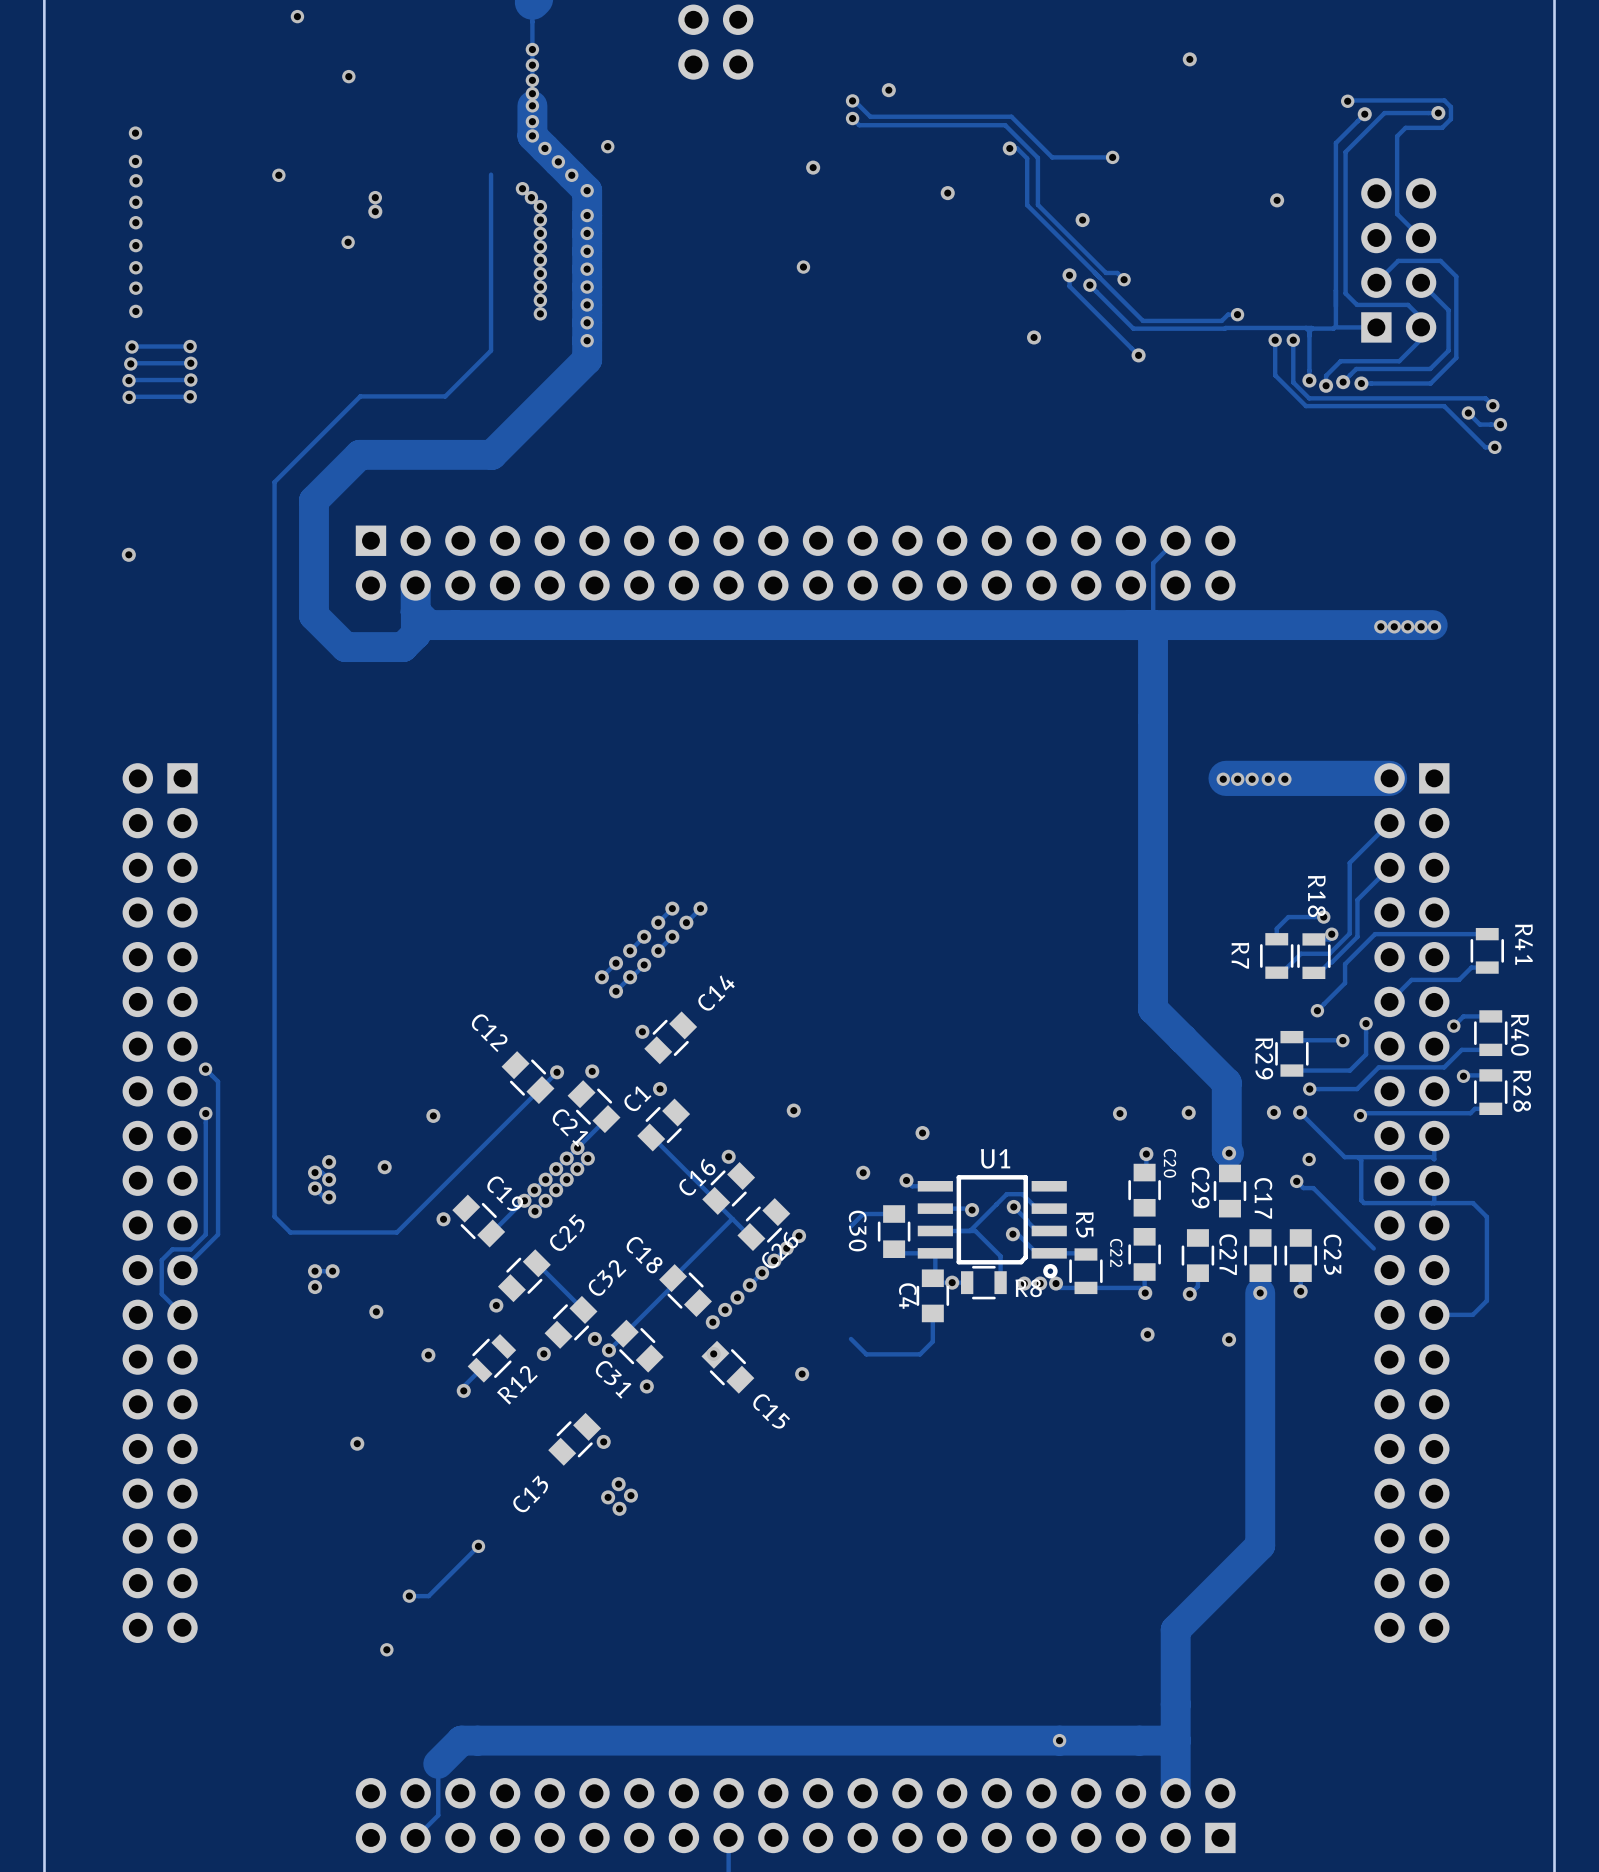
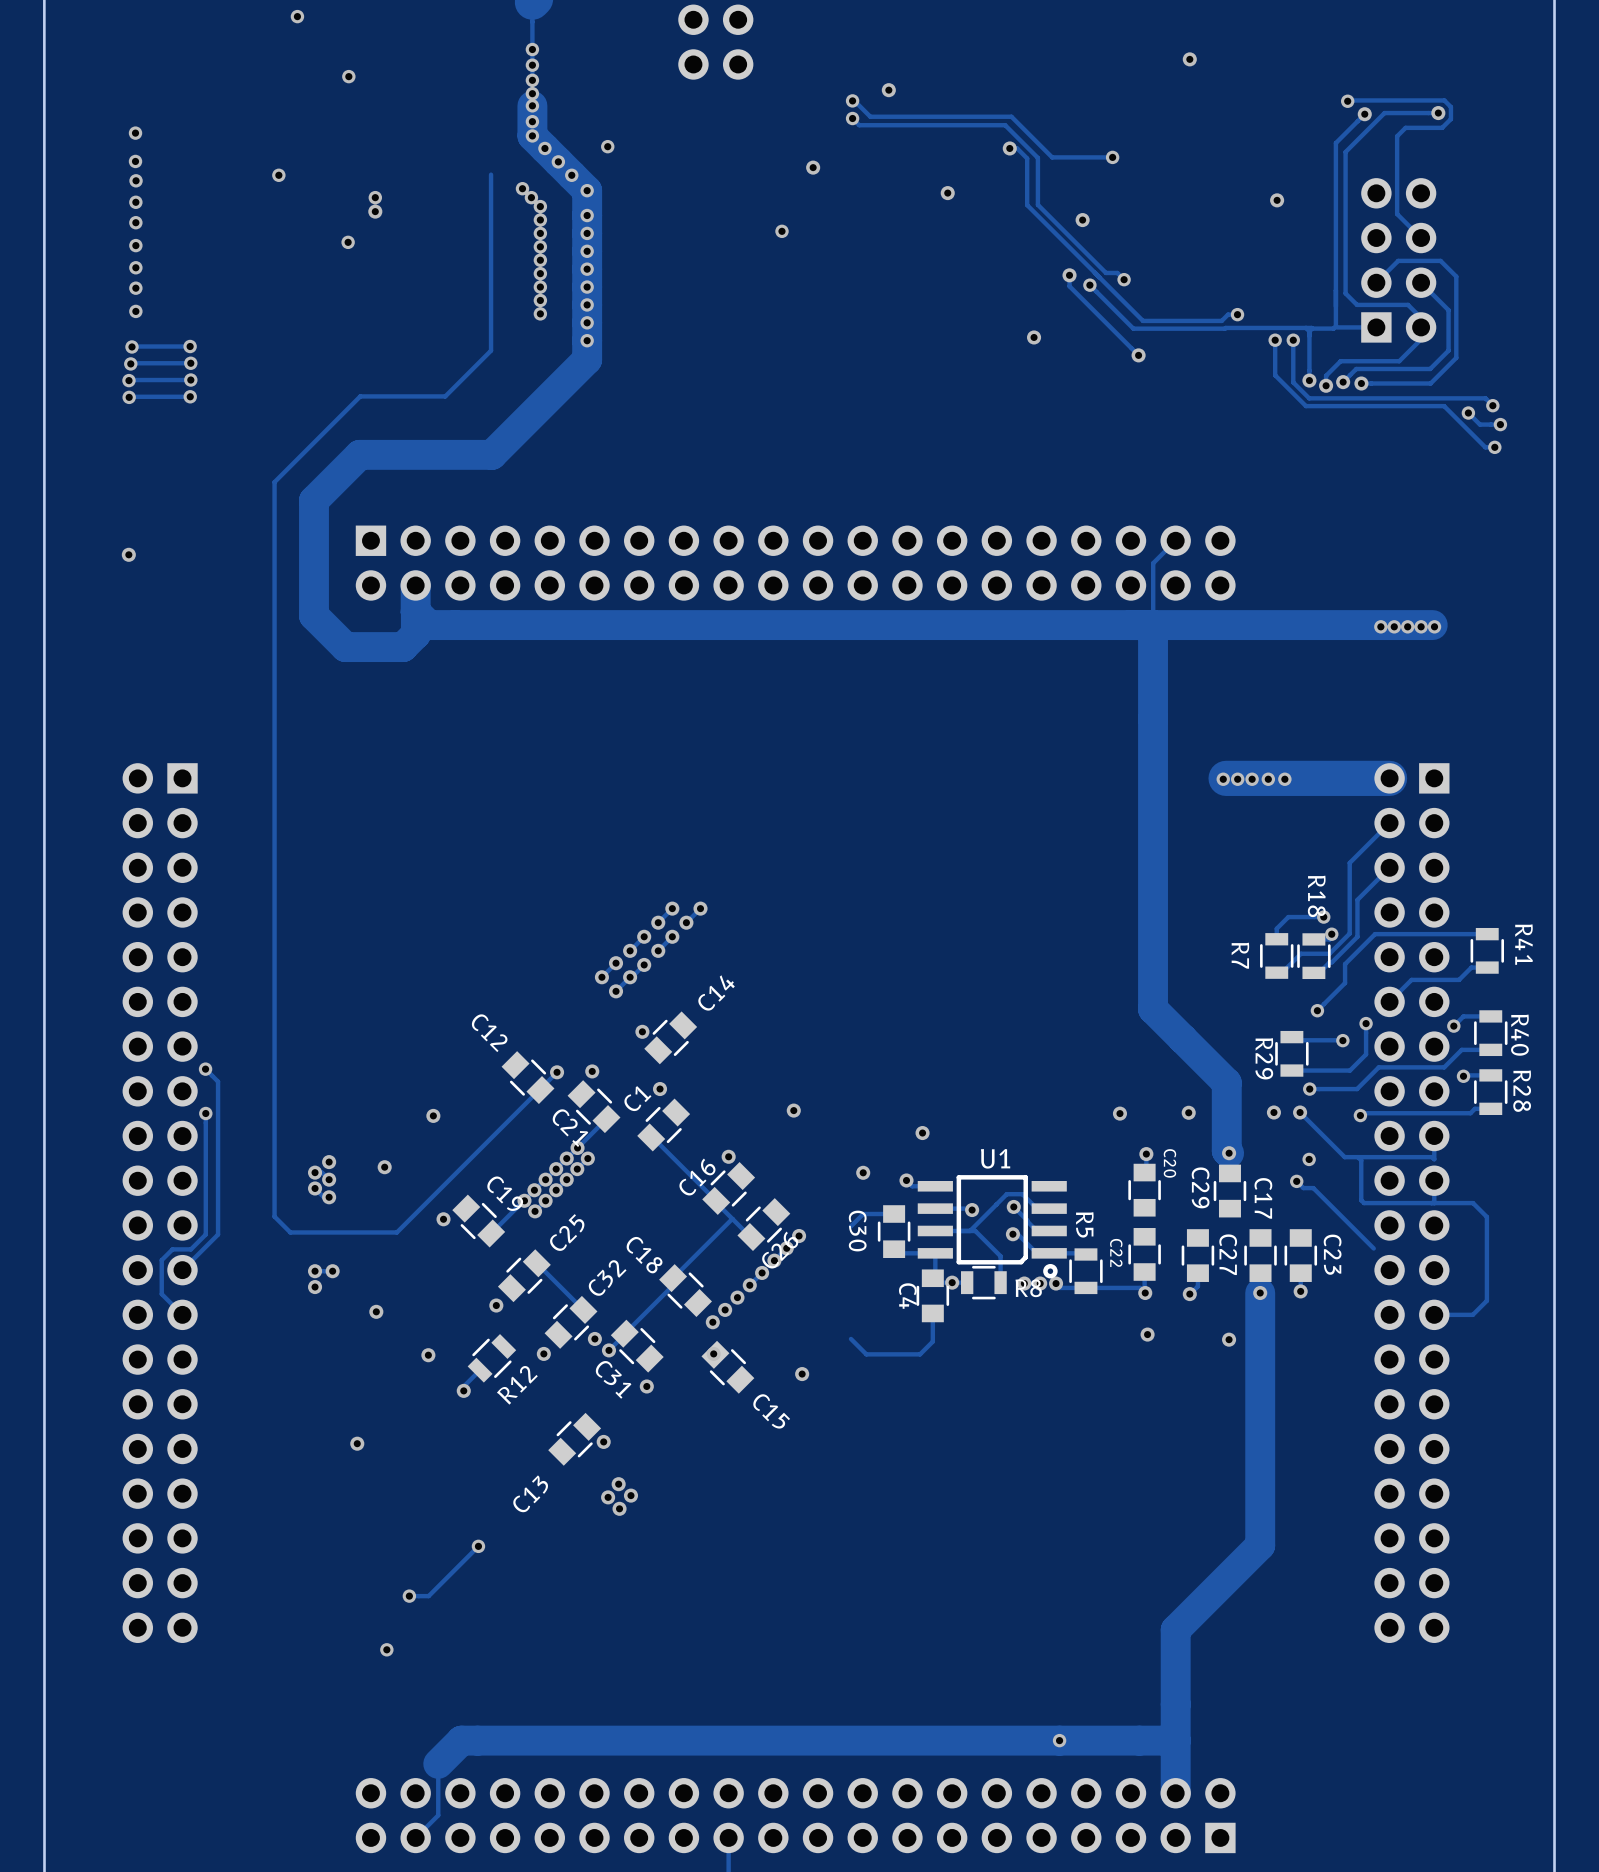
via position: (803, 267) -> (781, 231)

